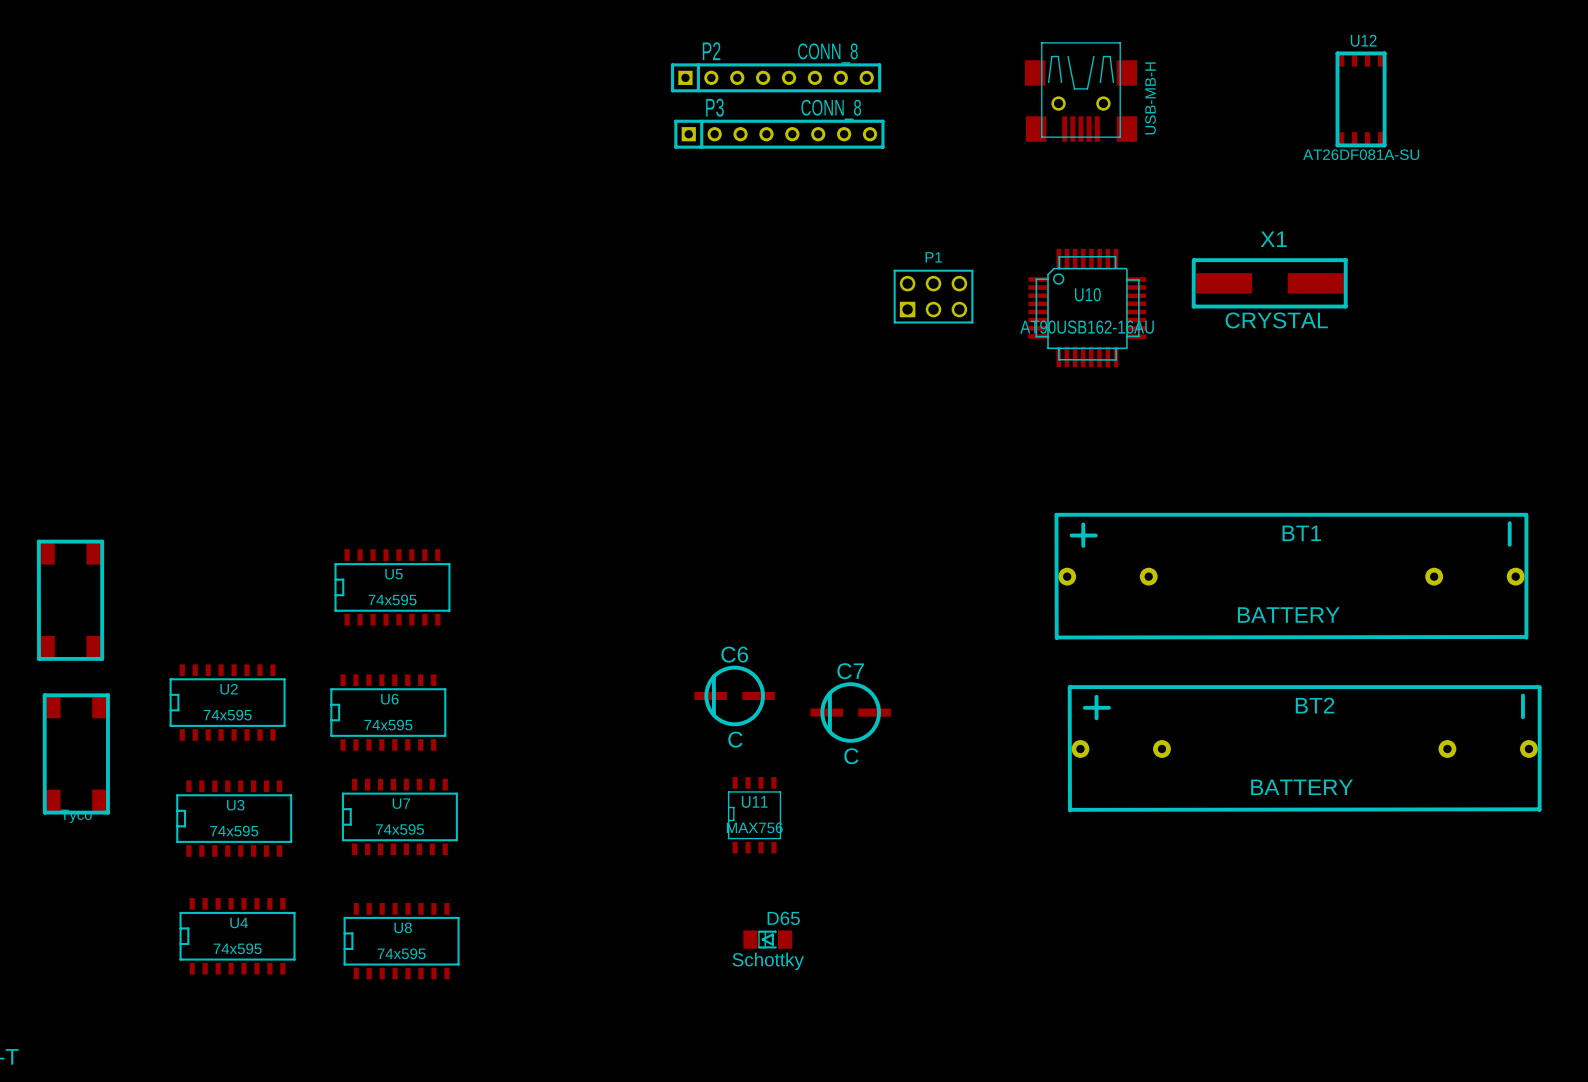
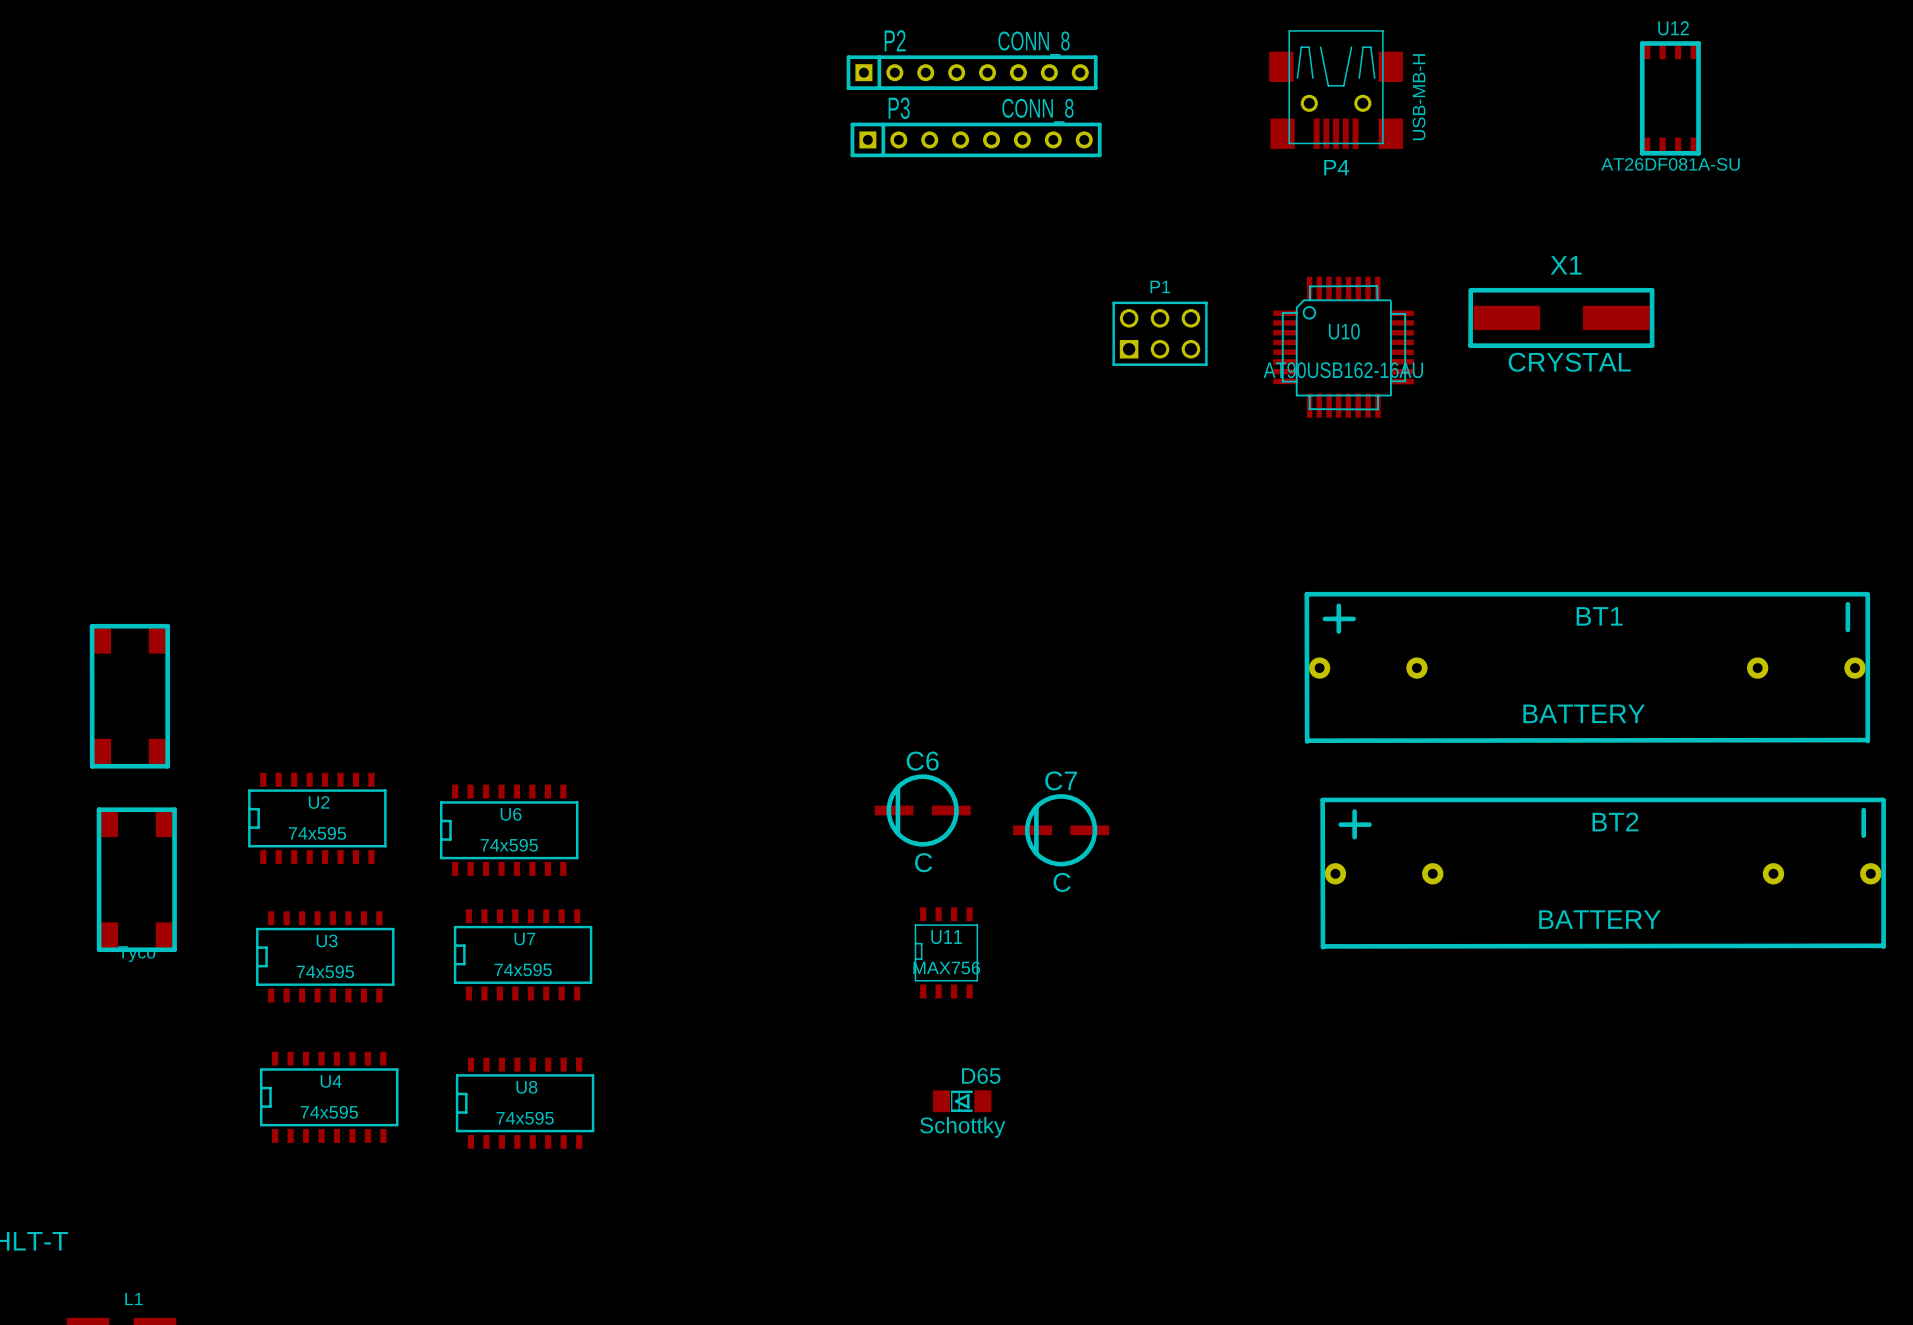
P4 name: none -> P4 (1336, 167)
U5: 74x595 (392, 587) -> none

